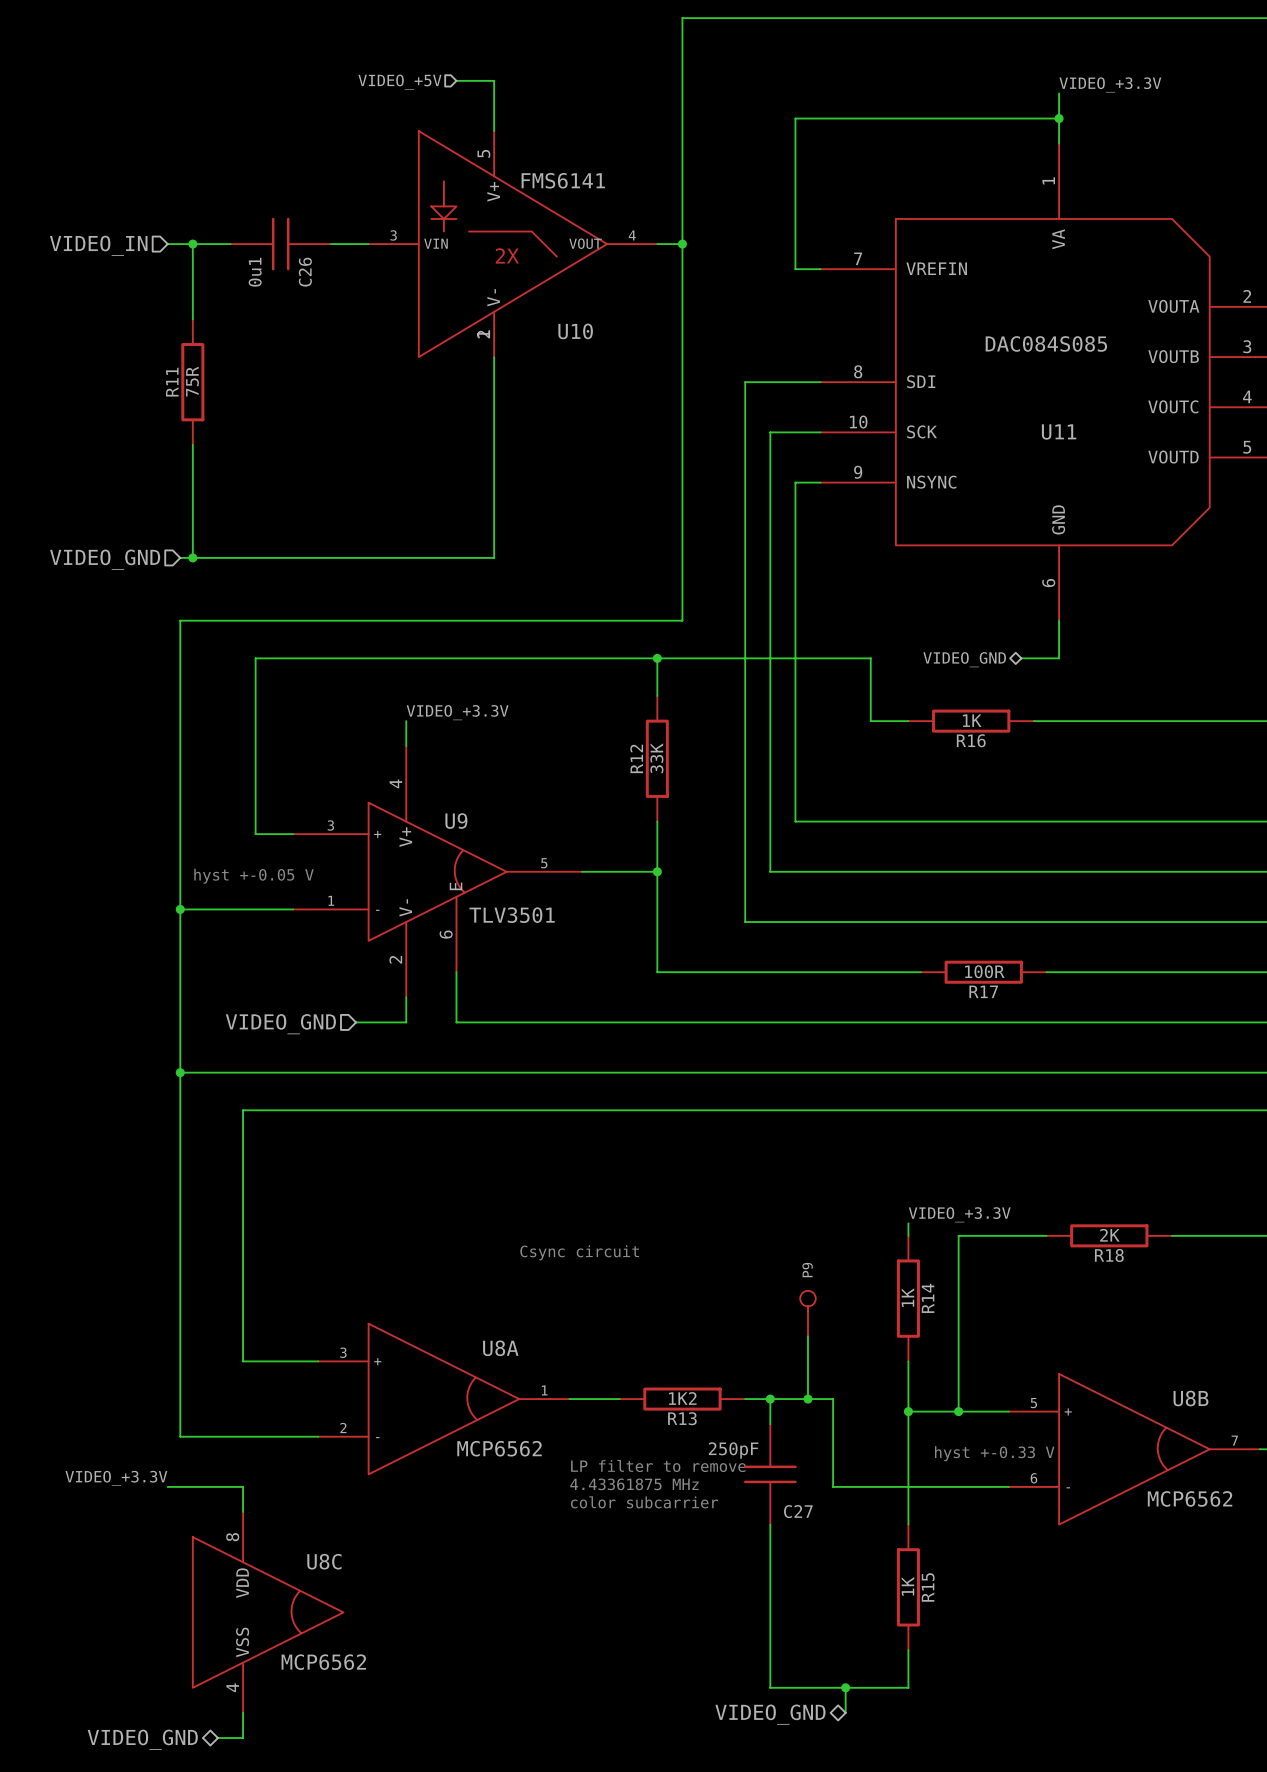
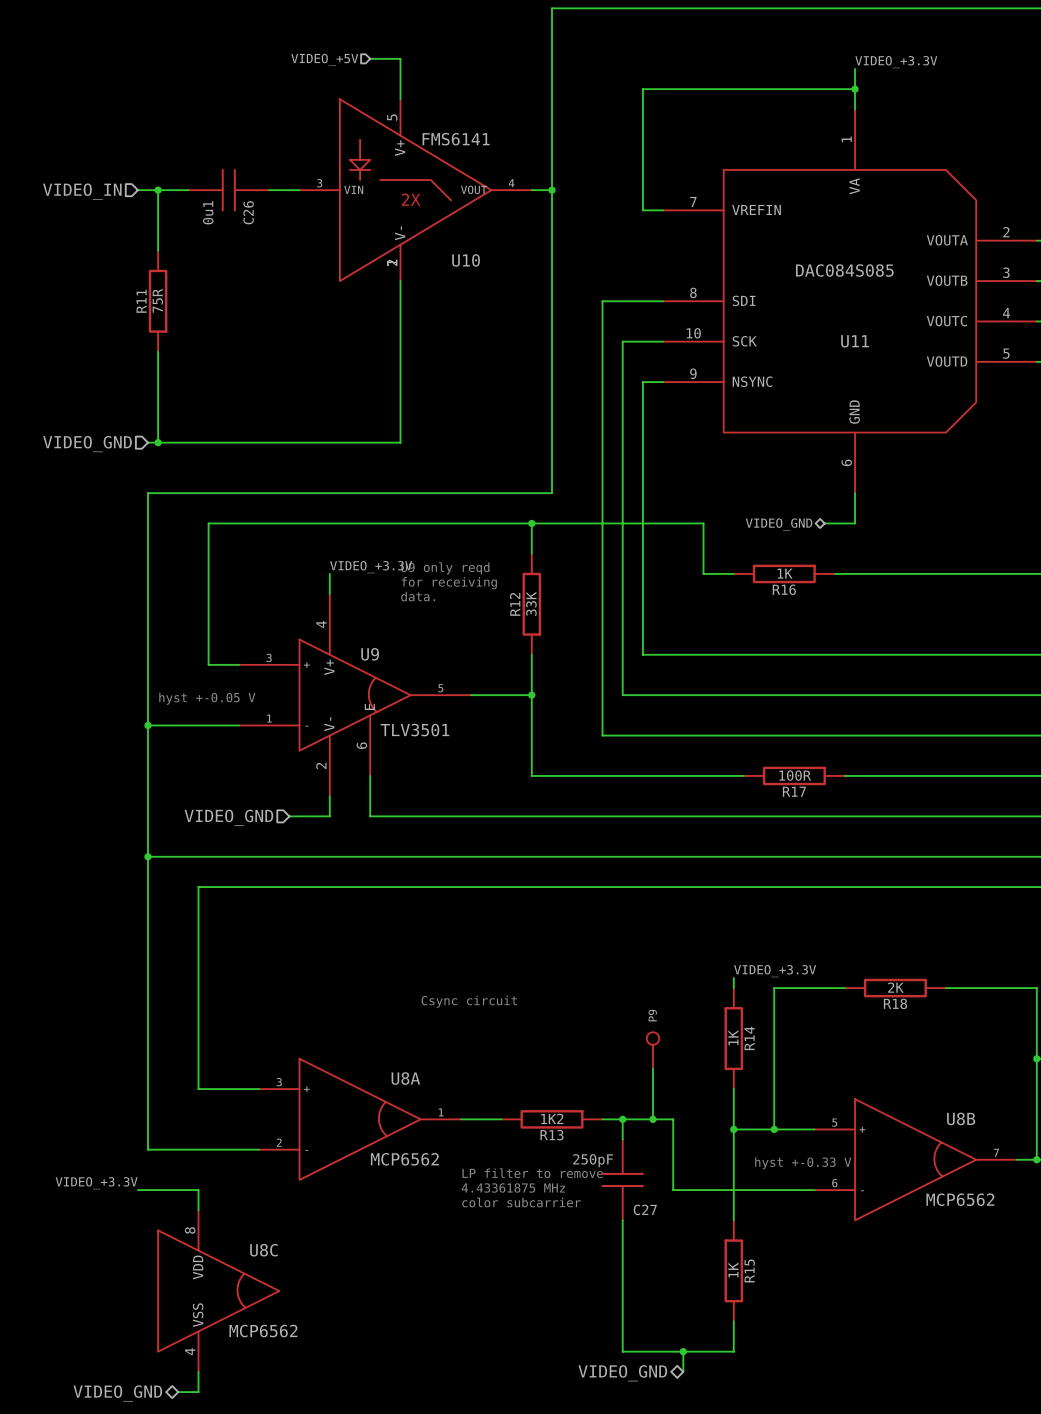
text: none -> U9 only reqd (445, 568)
text: none -> for receiving (449, 583)
text: none -> data. (418, 596)

